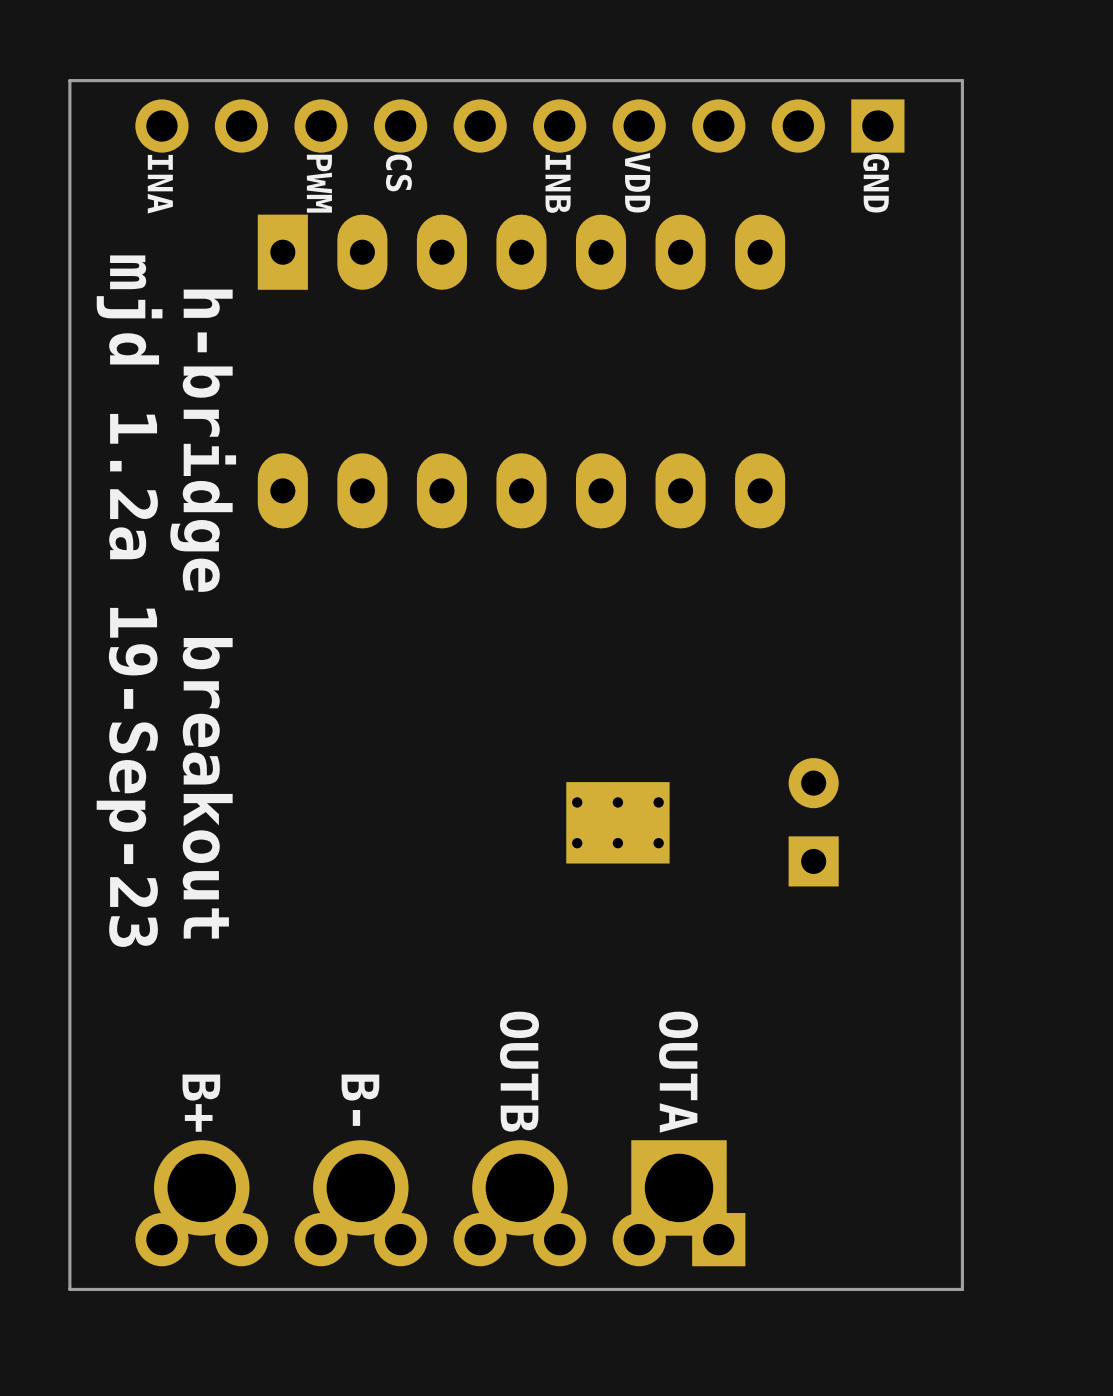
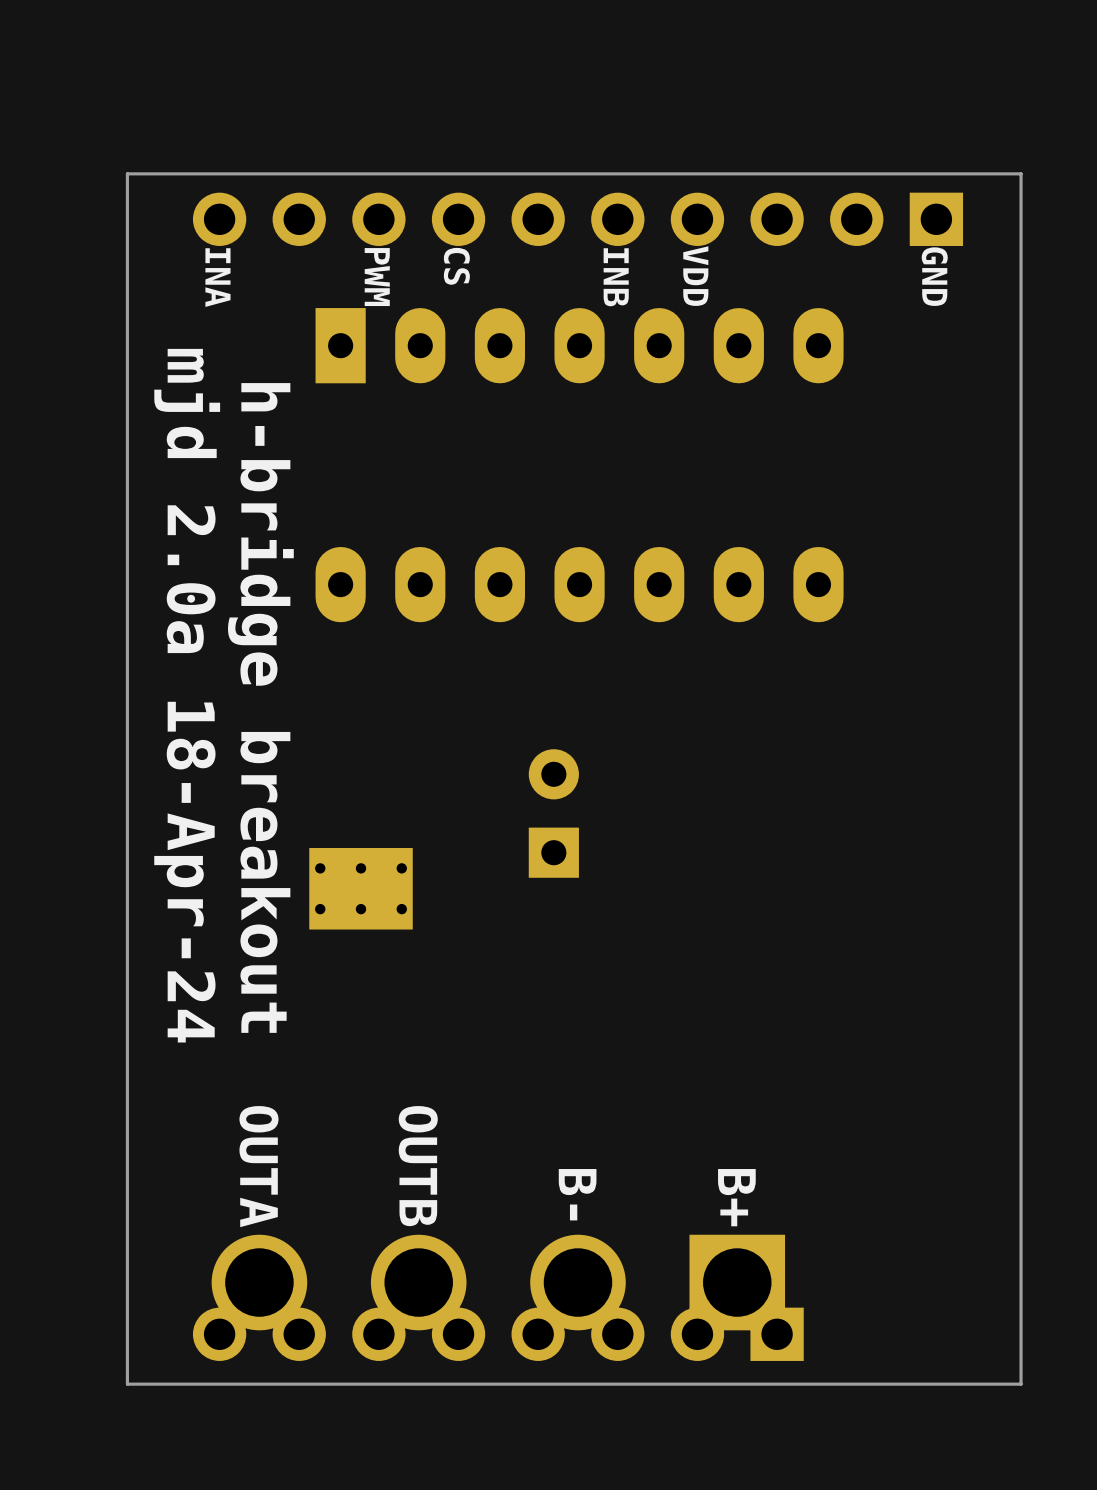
text: mjd 1.2a 19-Sep-23 (129, 601) -> mjd 2.0a 18-Apr-24 (187, 695)
part position: (617, 822) -> (361, 888)
part position: (813, 822) -> (553, 813)
text: OUTB (519, 1071) -> B- (577, 1194)
text: OUTA (678, 1072) -> B+ (736, 1197)
text: B- (360, 1100) -> OUTB (418, 1166)
text: B+ (201, 1103) -> OUTA (258, 1166)

